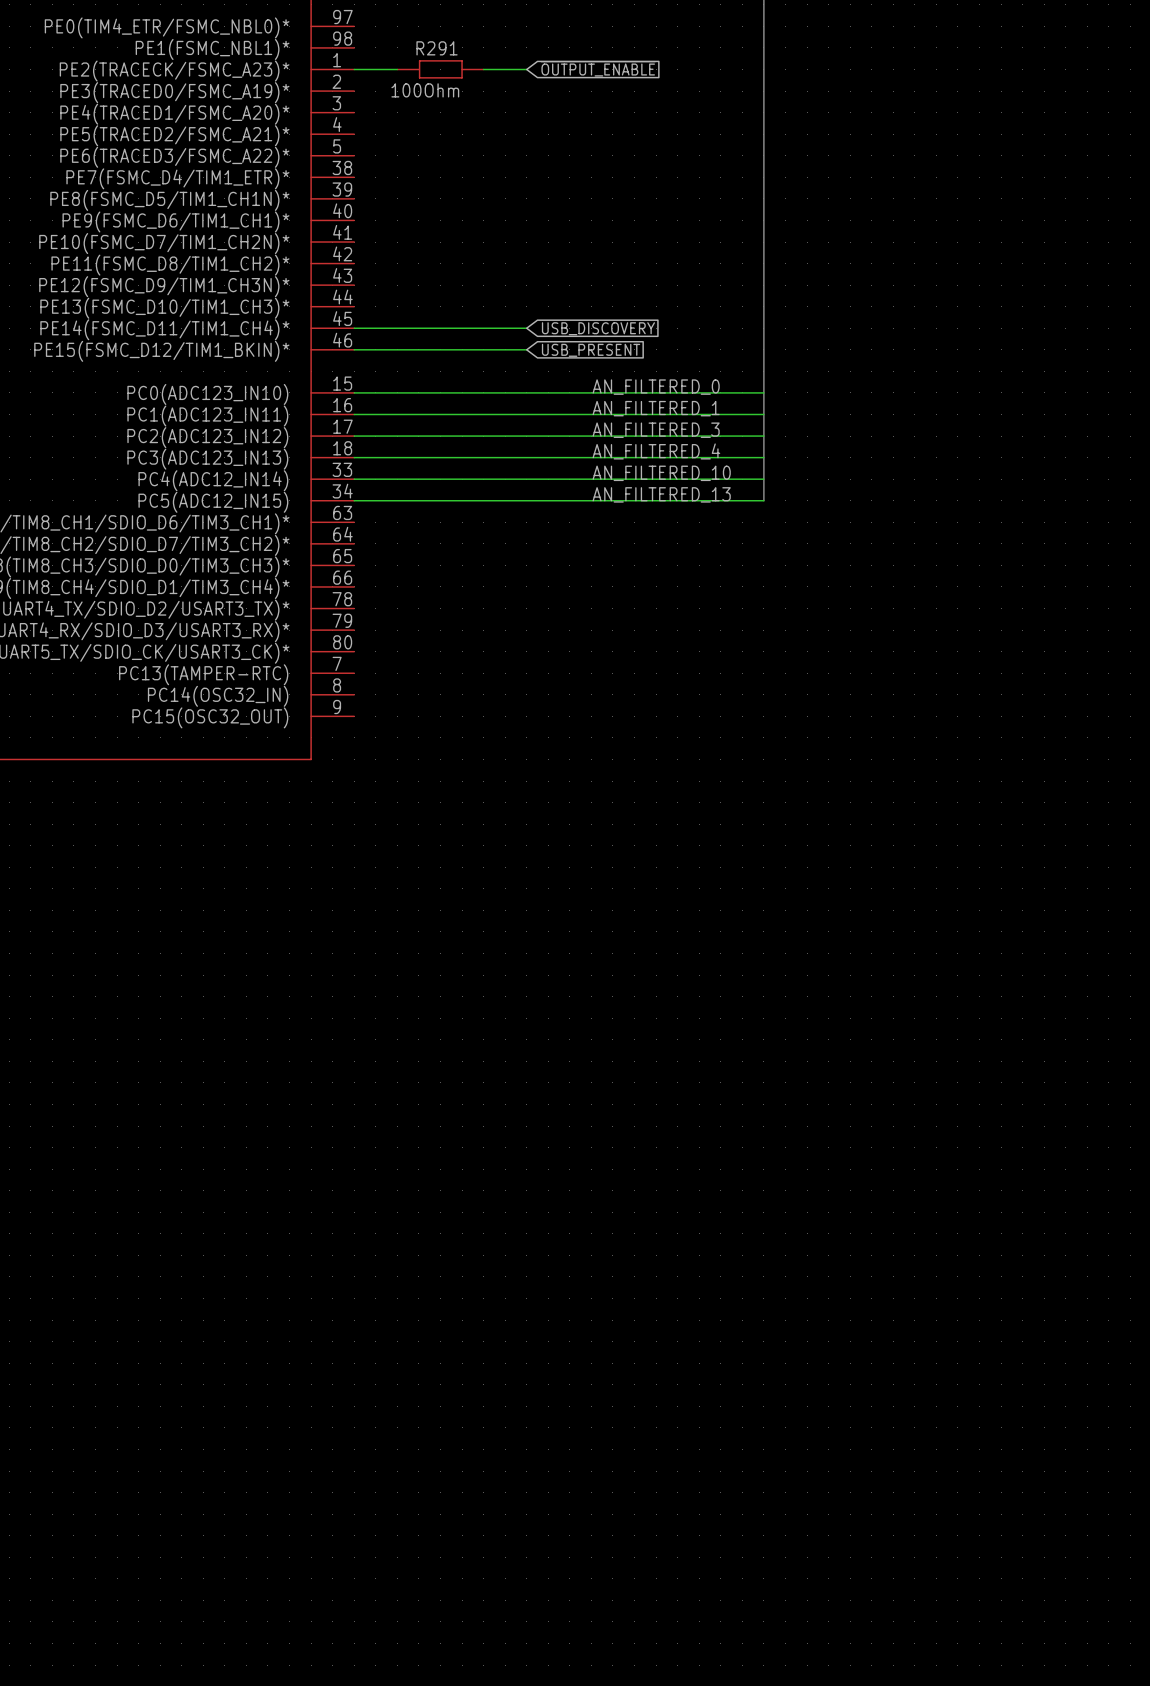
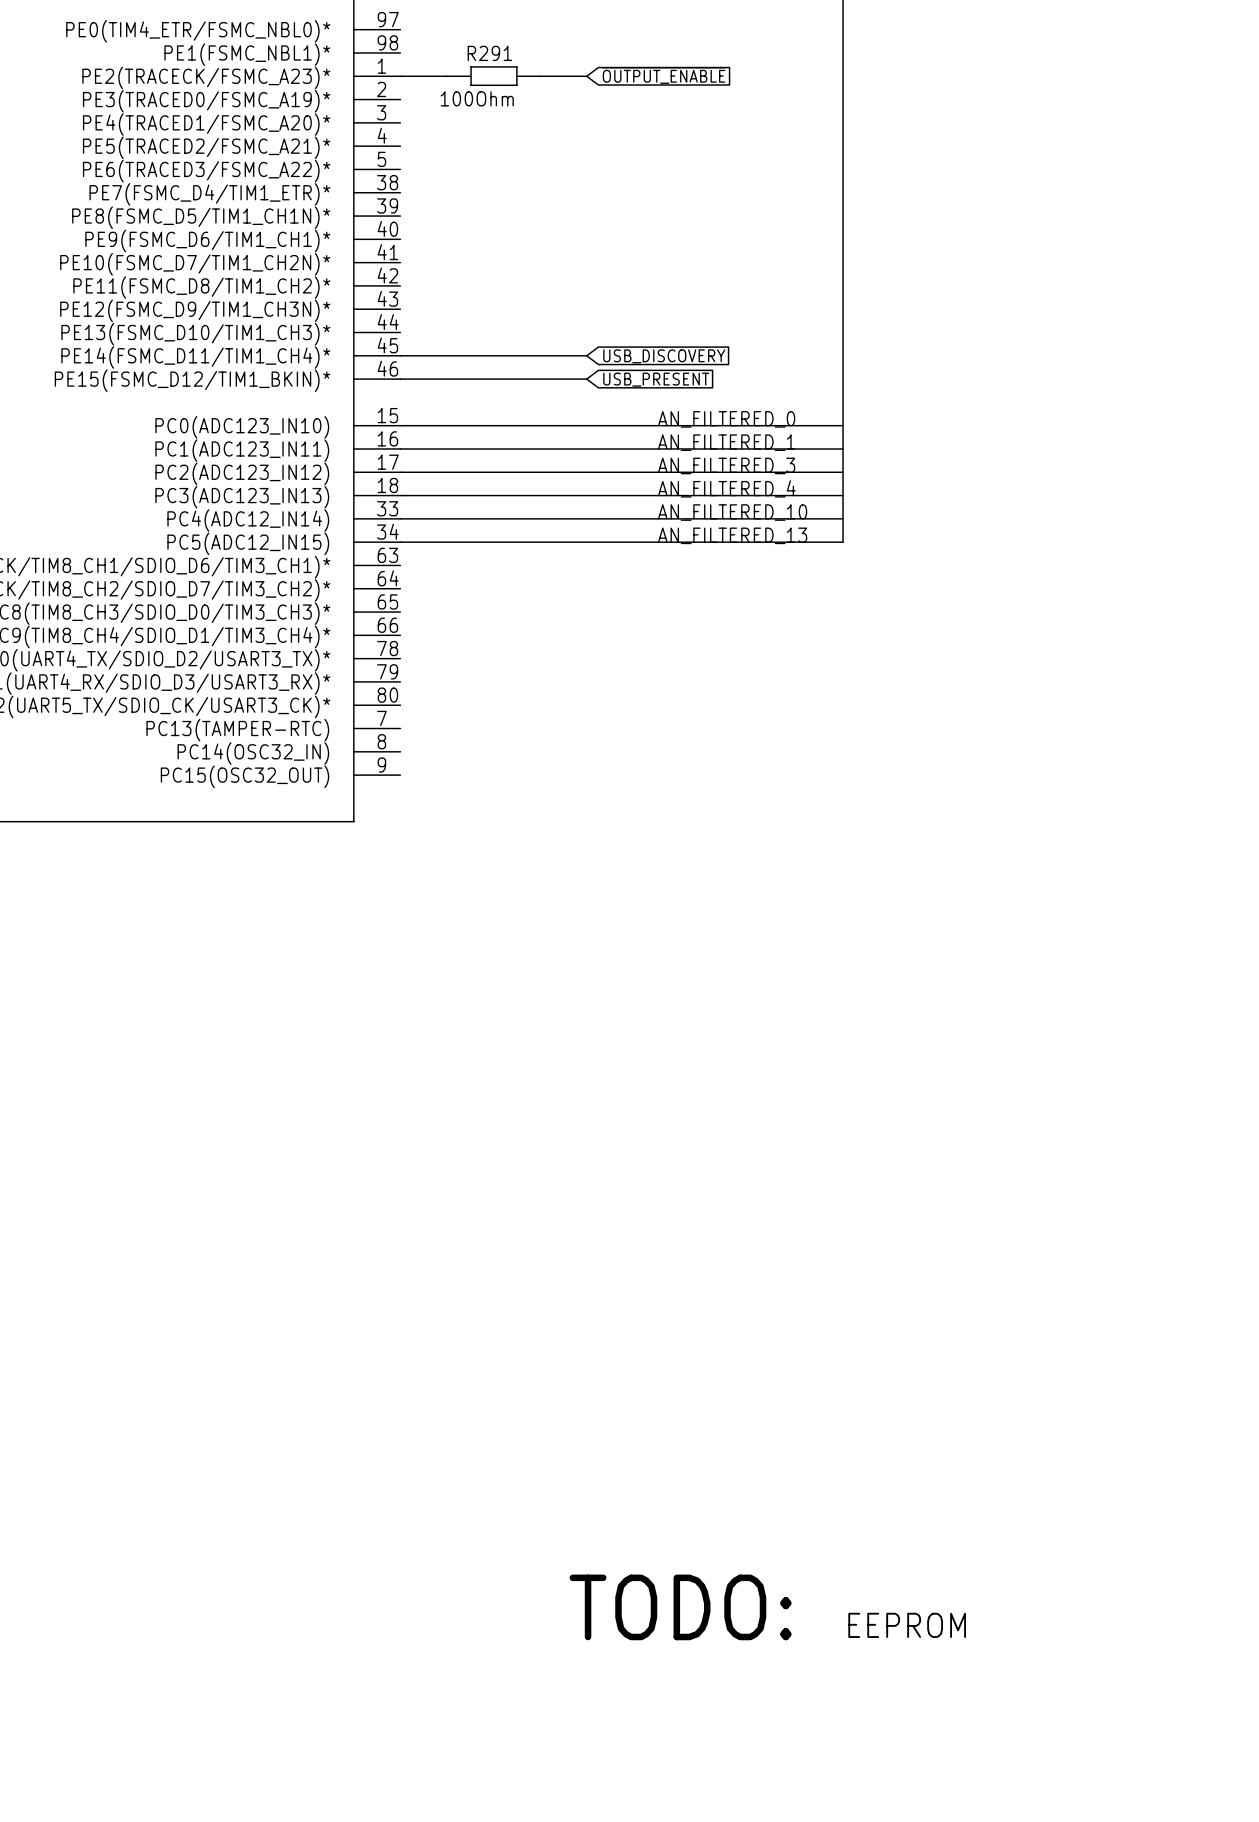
text: none -> TODO: (680, 1607)
text: none -> EEPROM (907, 1625)

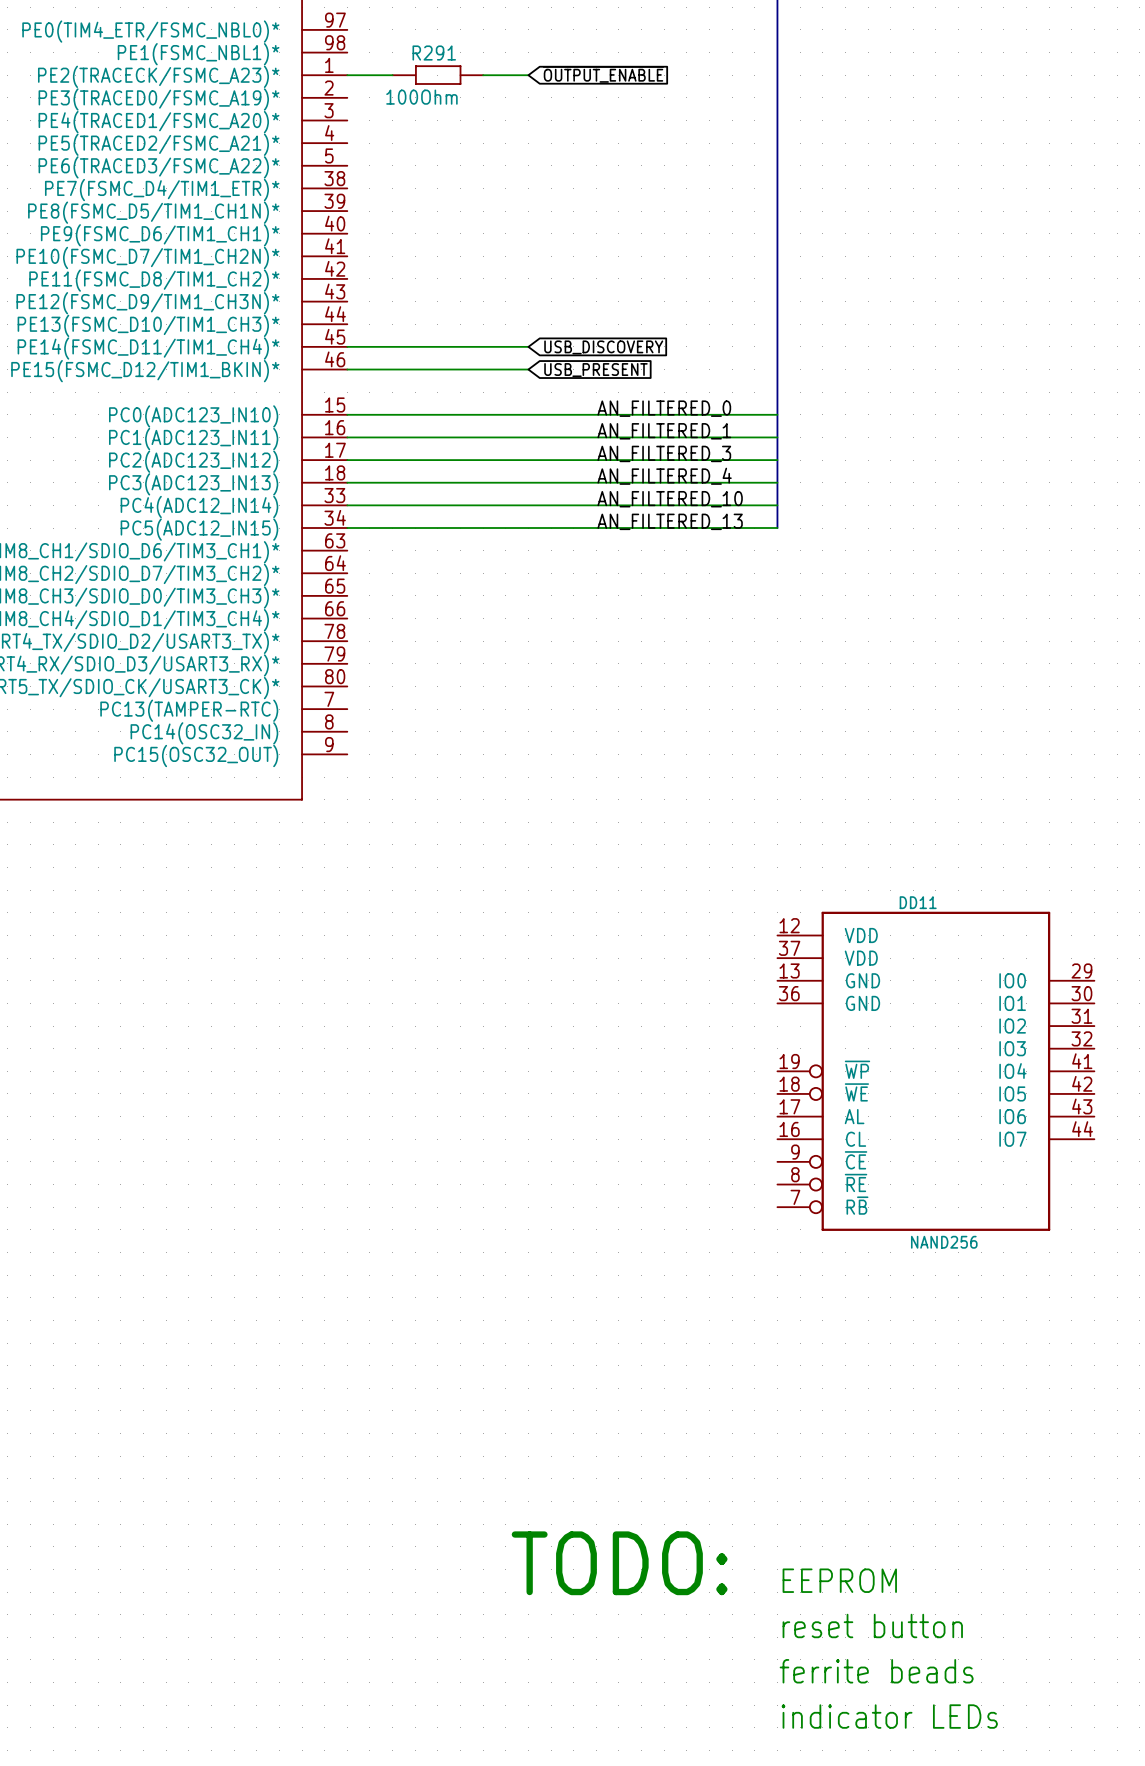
DD11: none -> NAND256 (935, 1071)
text: none -> reset button (872, 1625)
text: none -> ferrite beads (876, 1671)
text: none -> indicator LEDs (889, 1716)

